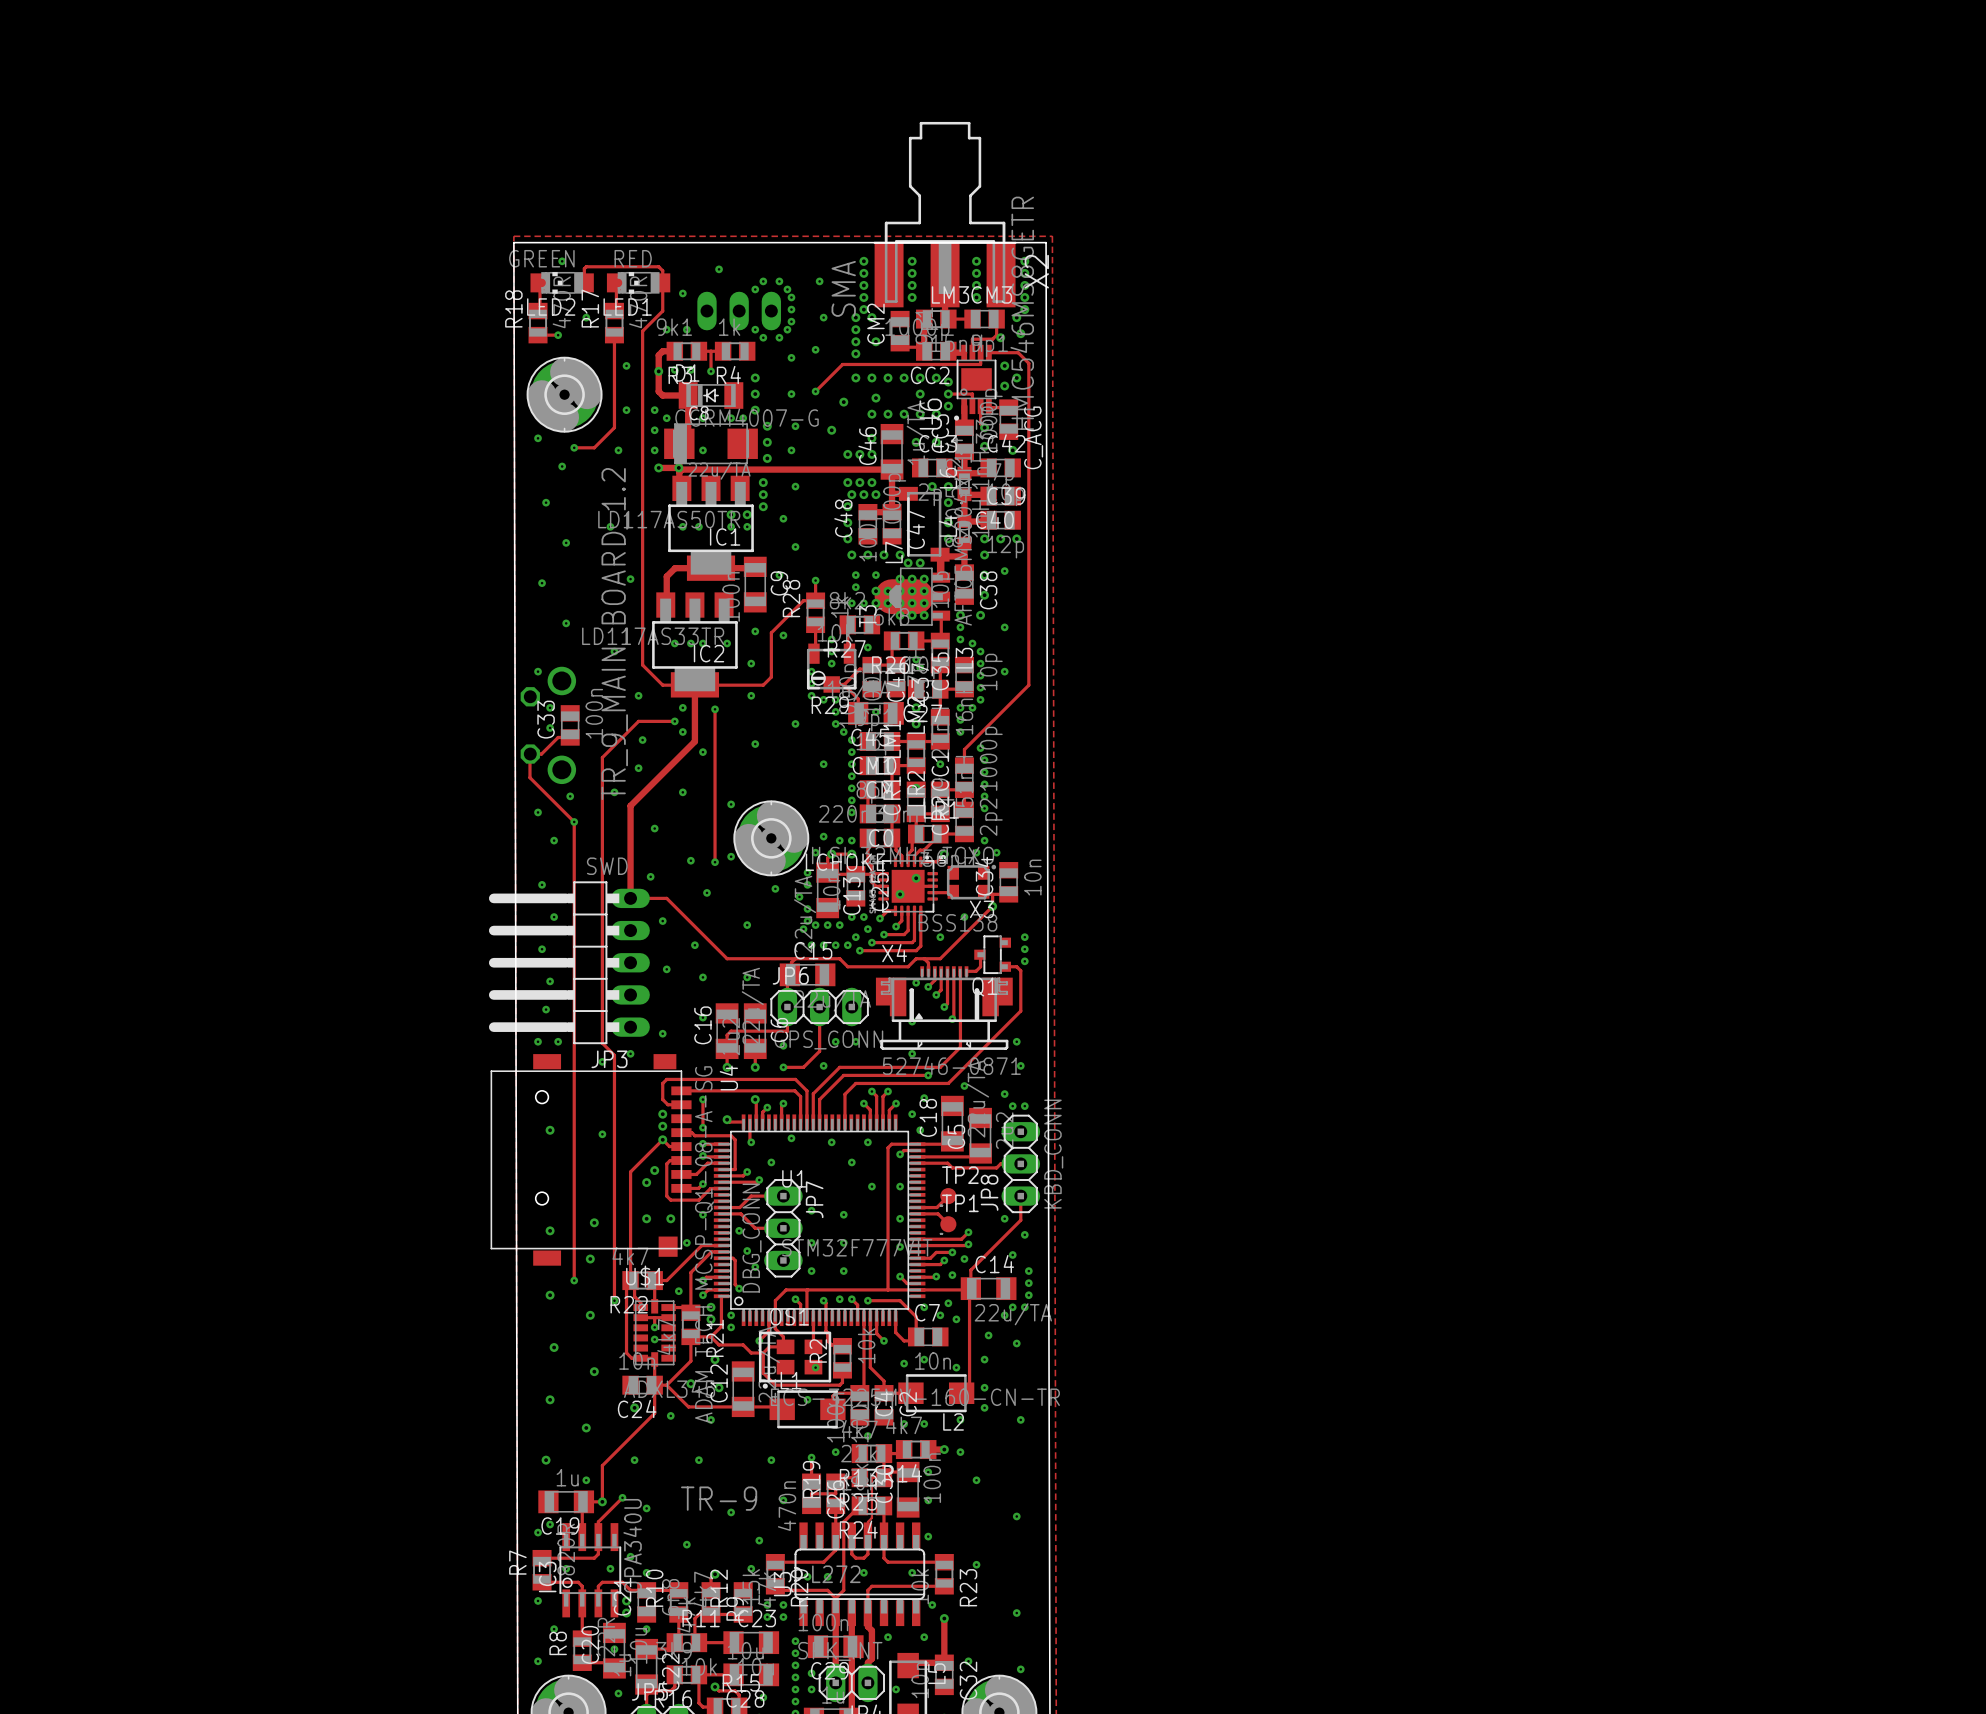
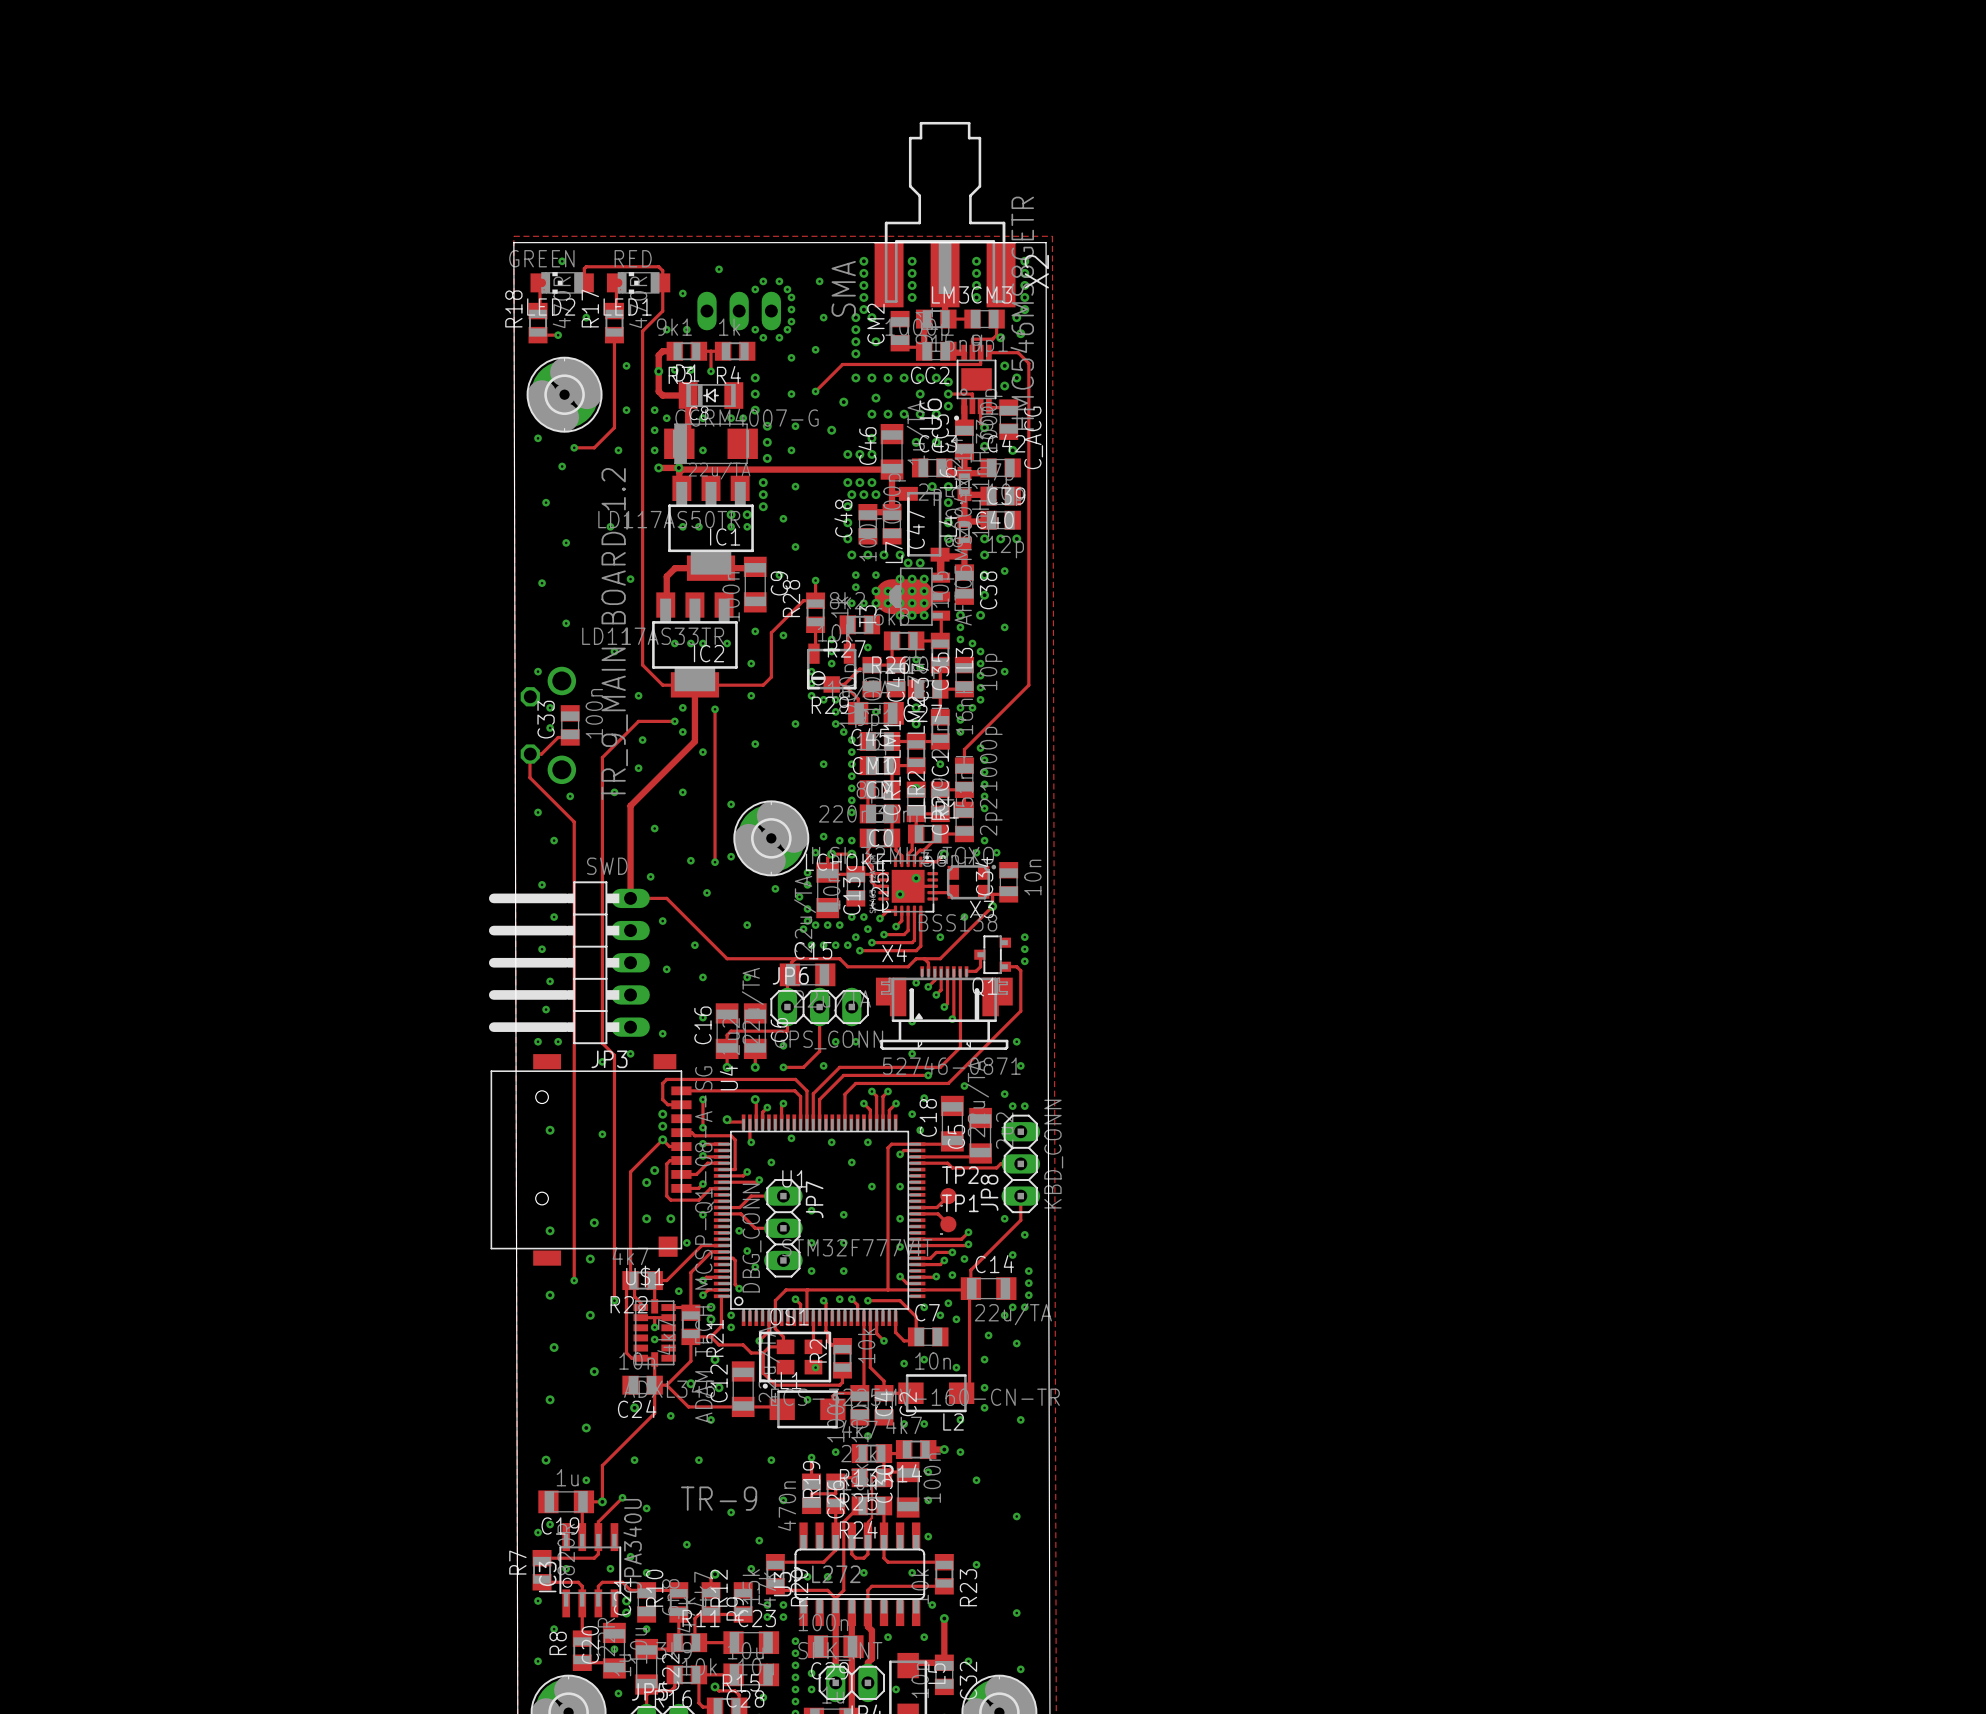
via: (574, 821) -> none

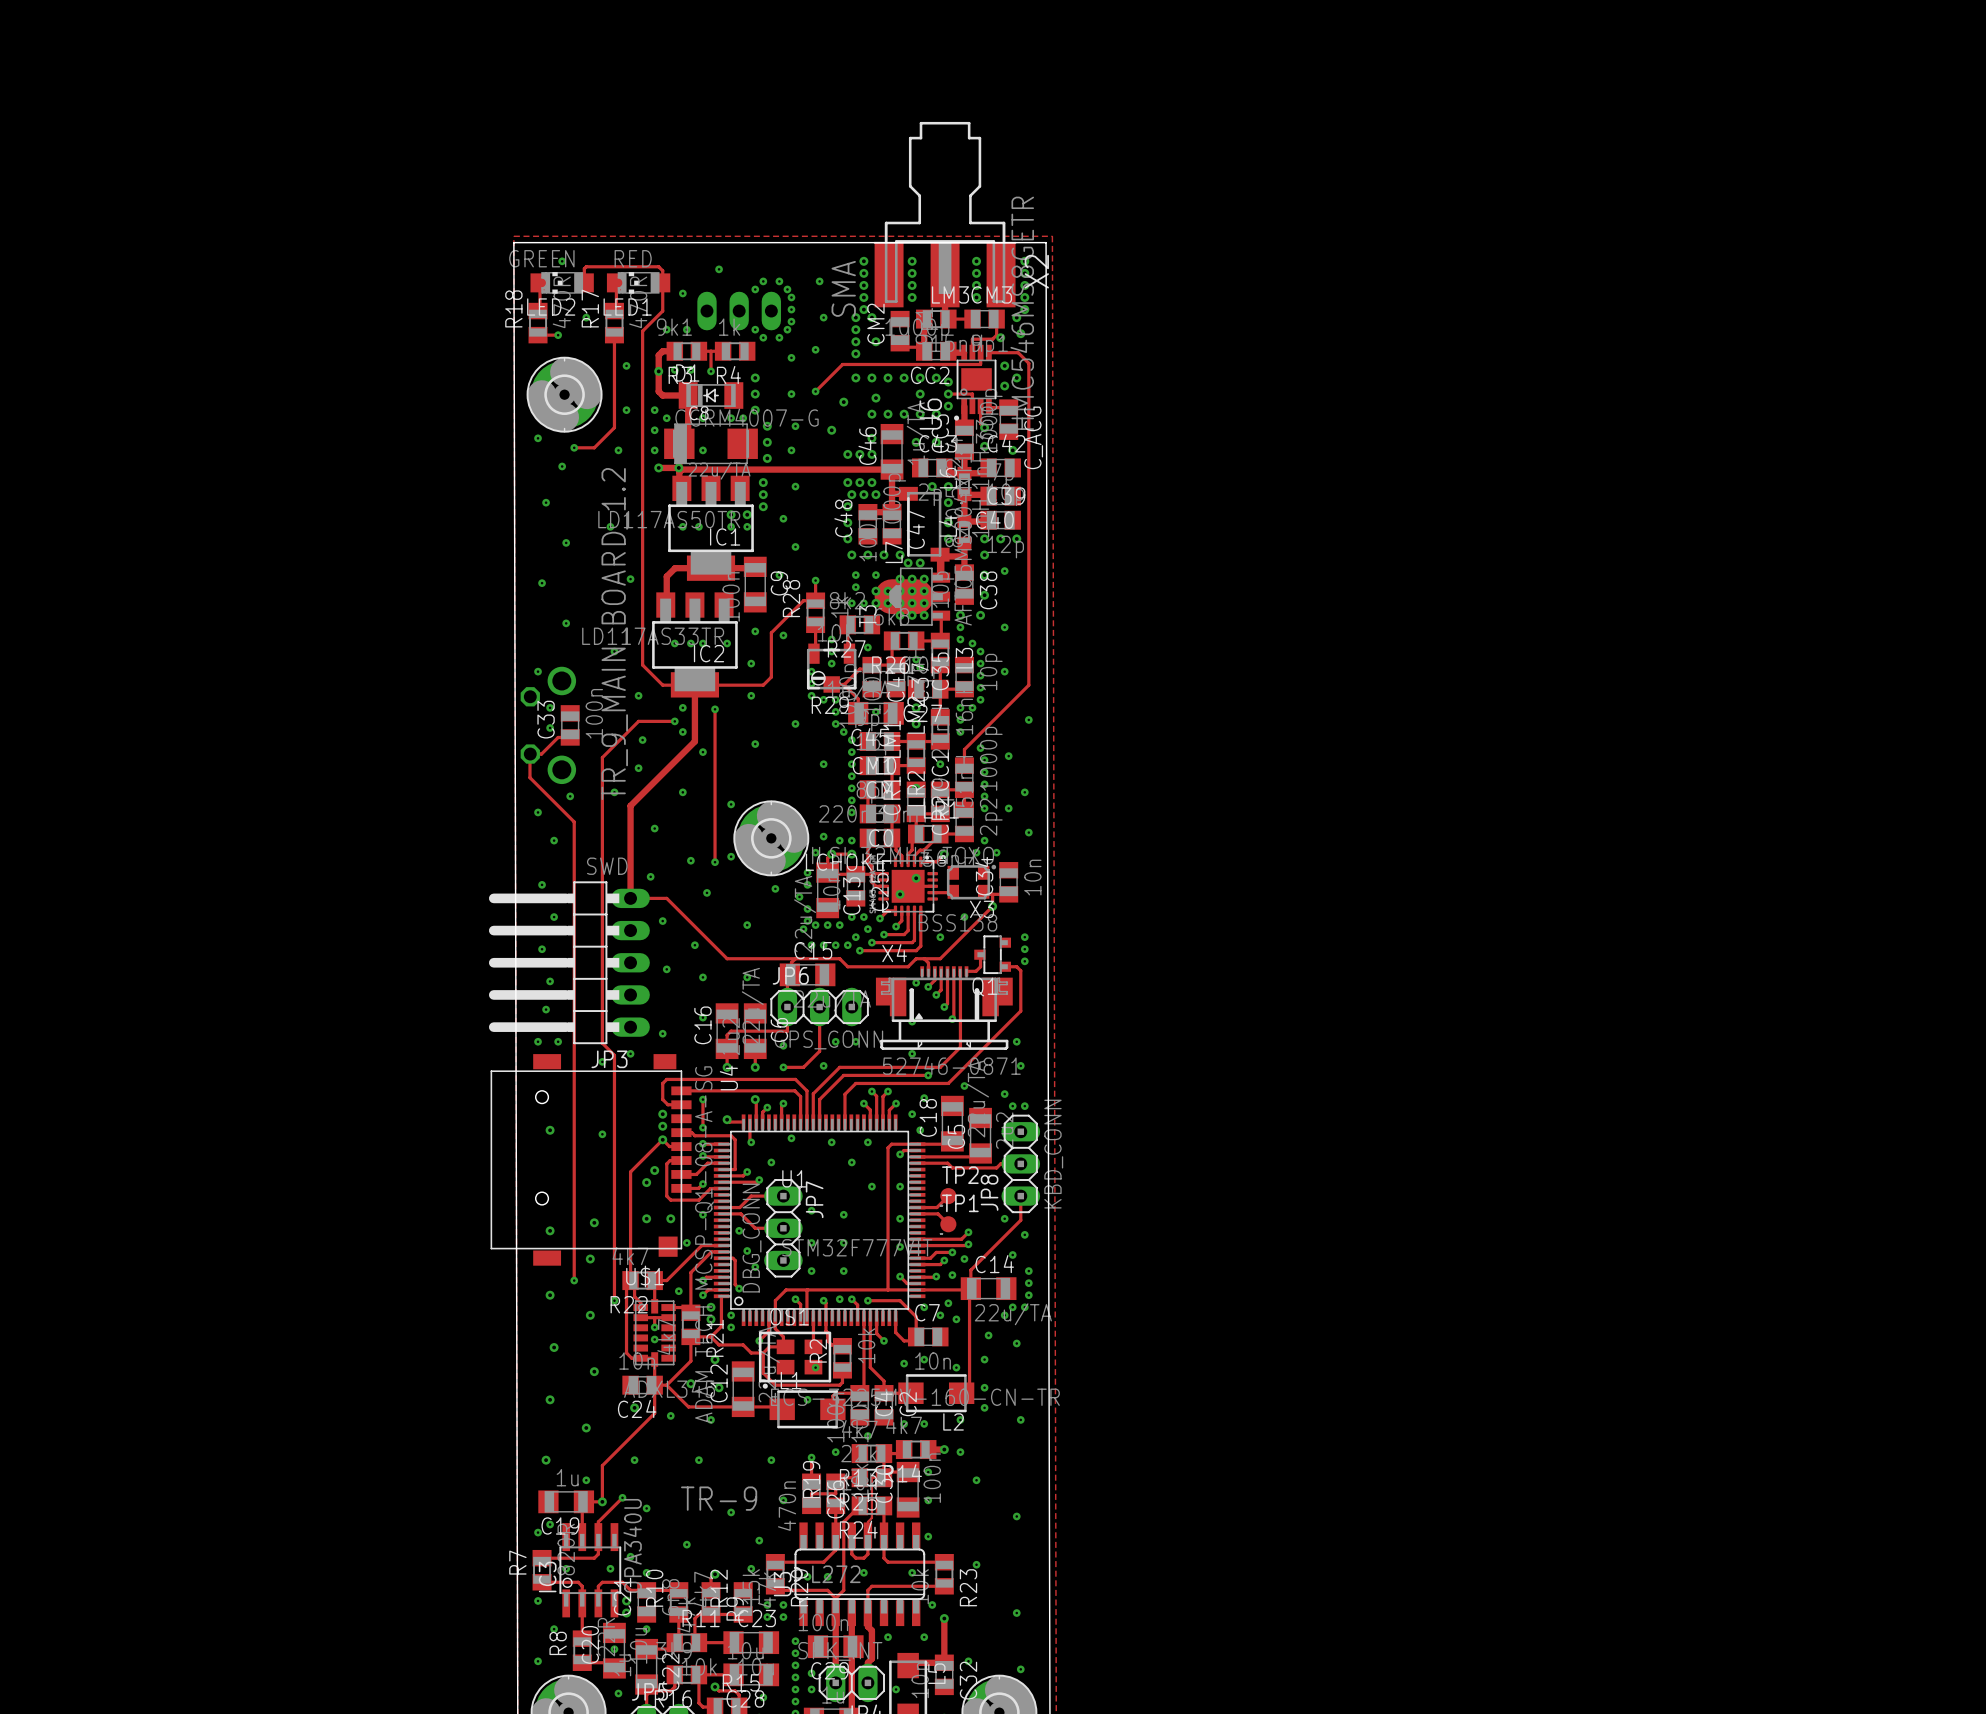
via: none -> (1028, 719)
via: none -> (1008, 756)
via: none -> (1024, 792)
via: none -> (1008, 808)
via: none -> (1028, 832)

